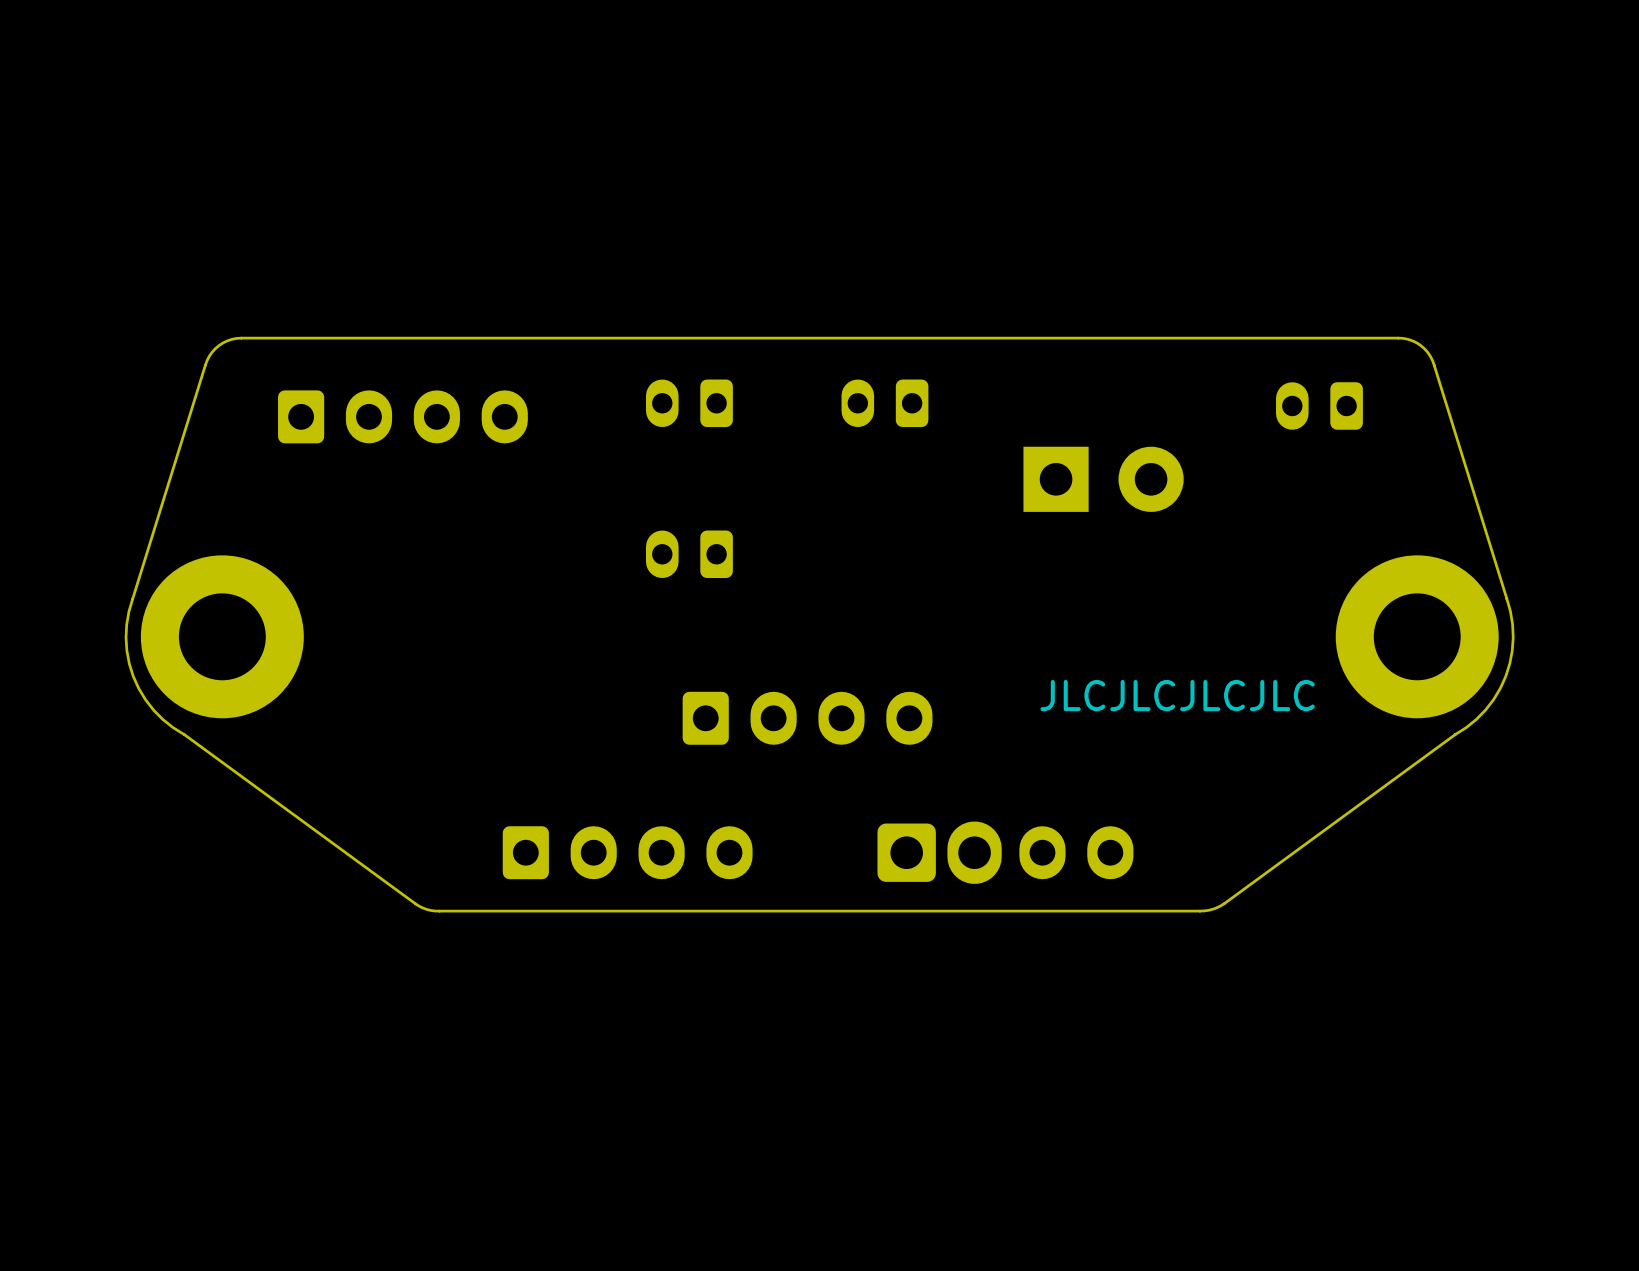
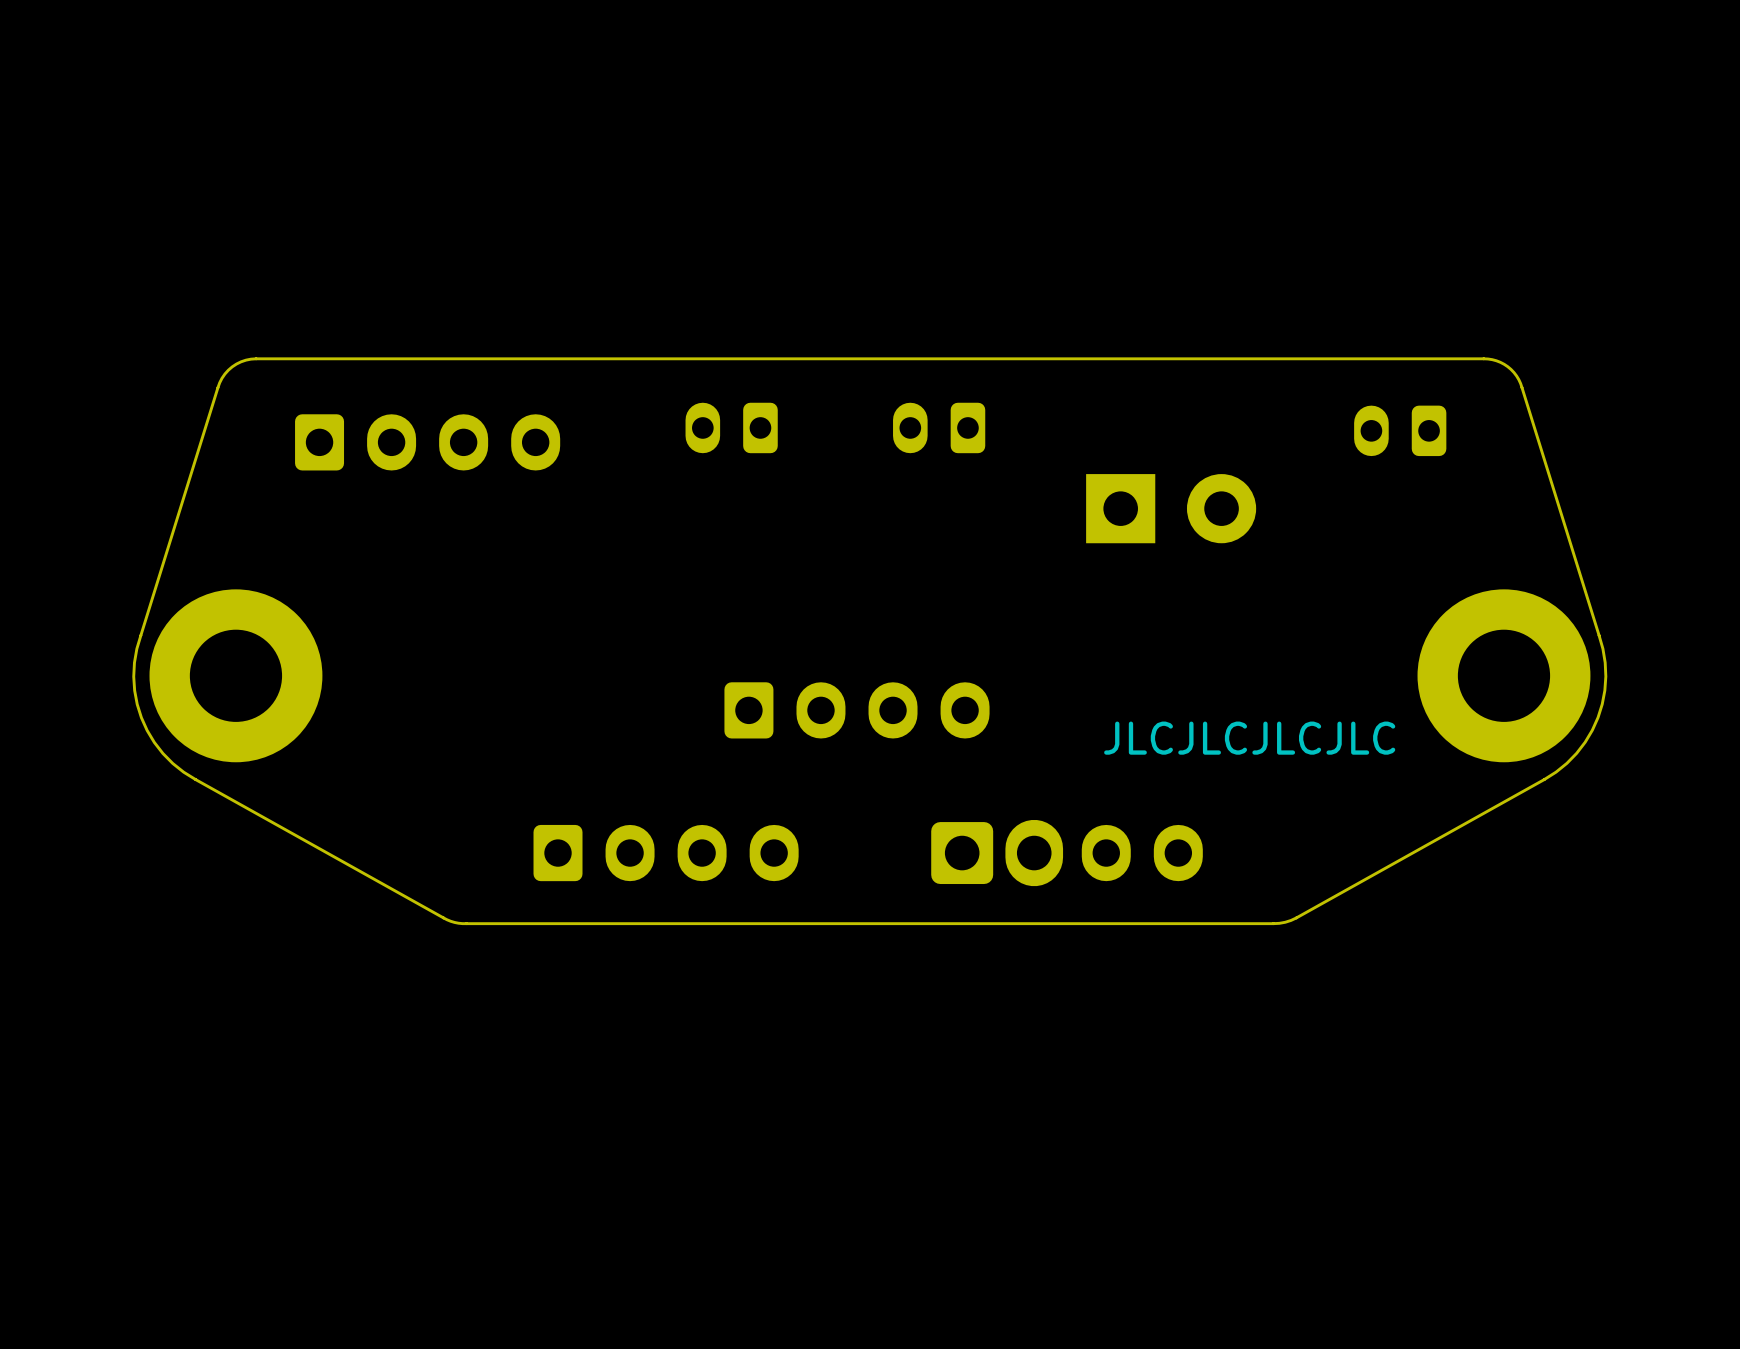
part: (689, 554) -> none
part position: (807, 718) -> (857, 710)
board edge: (1455, 734) (1224, 903) (1212, 909) (1199, 911) (431, 910) (415, 903) (184, 734) -> (1544, 779) (1296, 917) (1279, 923) (466, 923) (454, 922) (443, 917) (195, 779)
part position: (627, 852) -> (666, 853)
part position: (1005, 852) -> (1067, 853)

